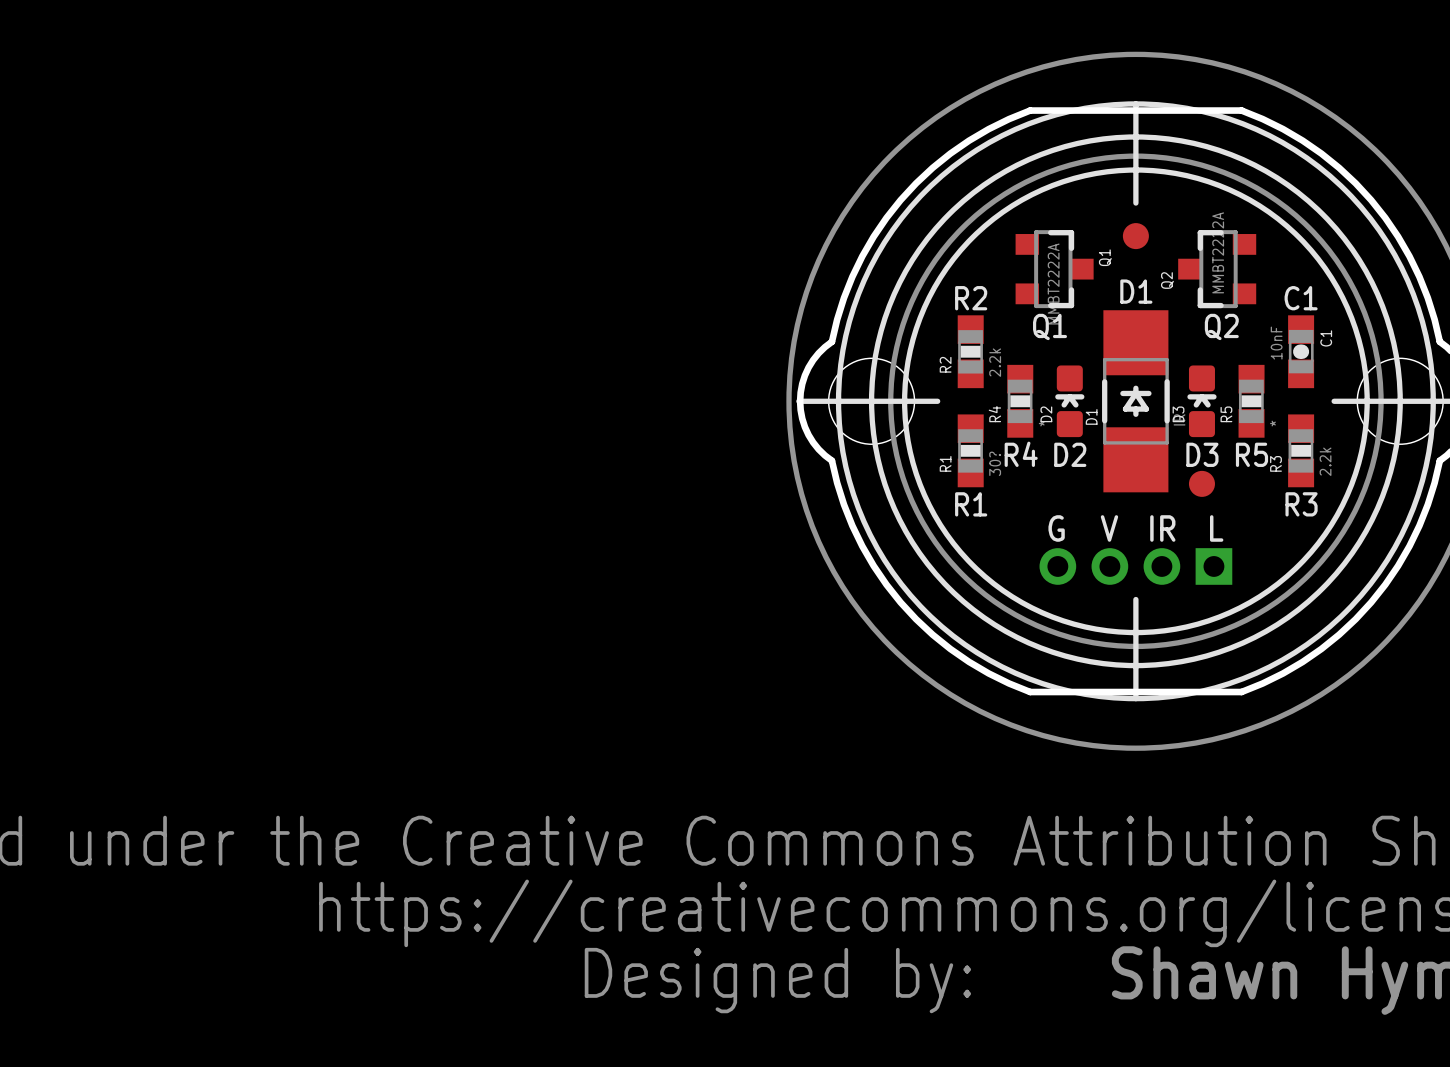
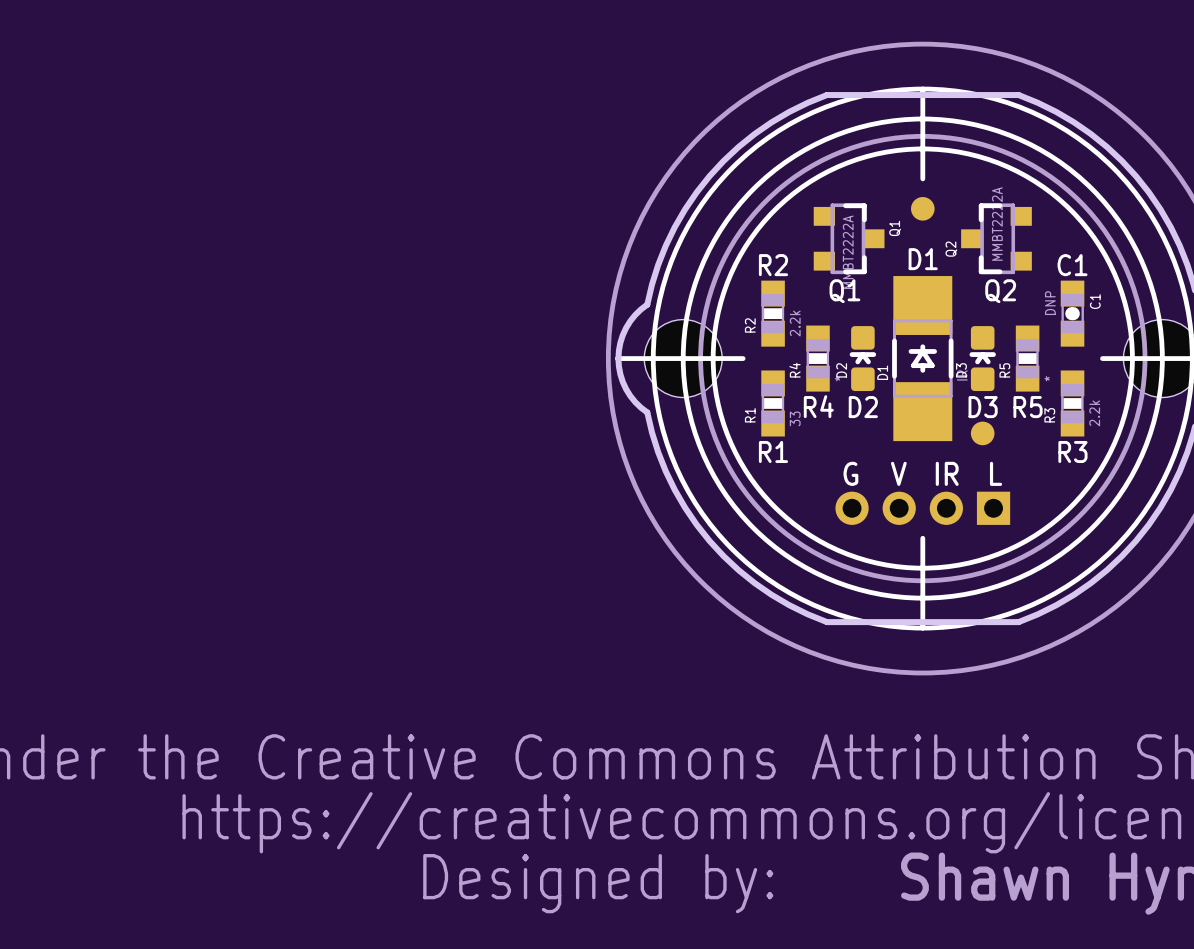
C1 value: 10nF (1276, 343) -> DNP (1050, 303)
R1 value: 30? (995, 463) -> 33 (795, 418)

